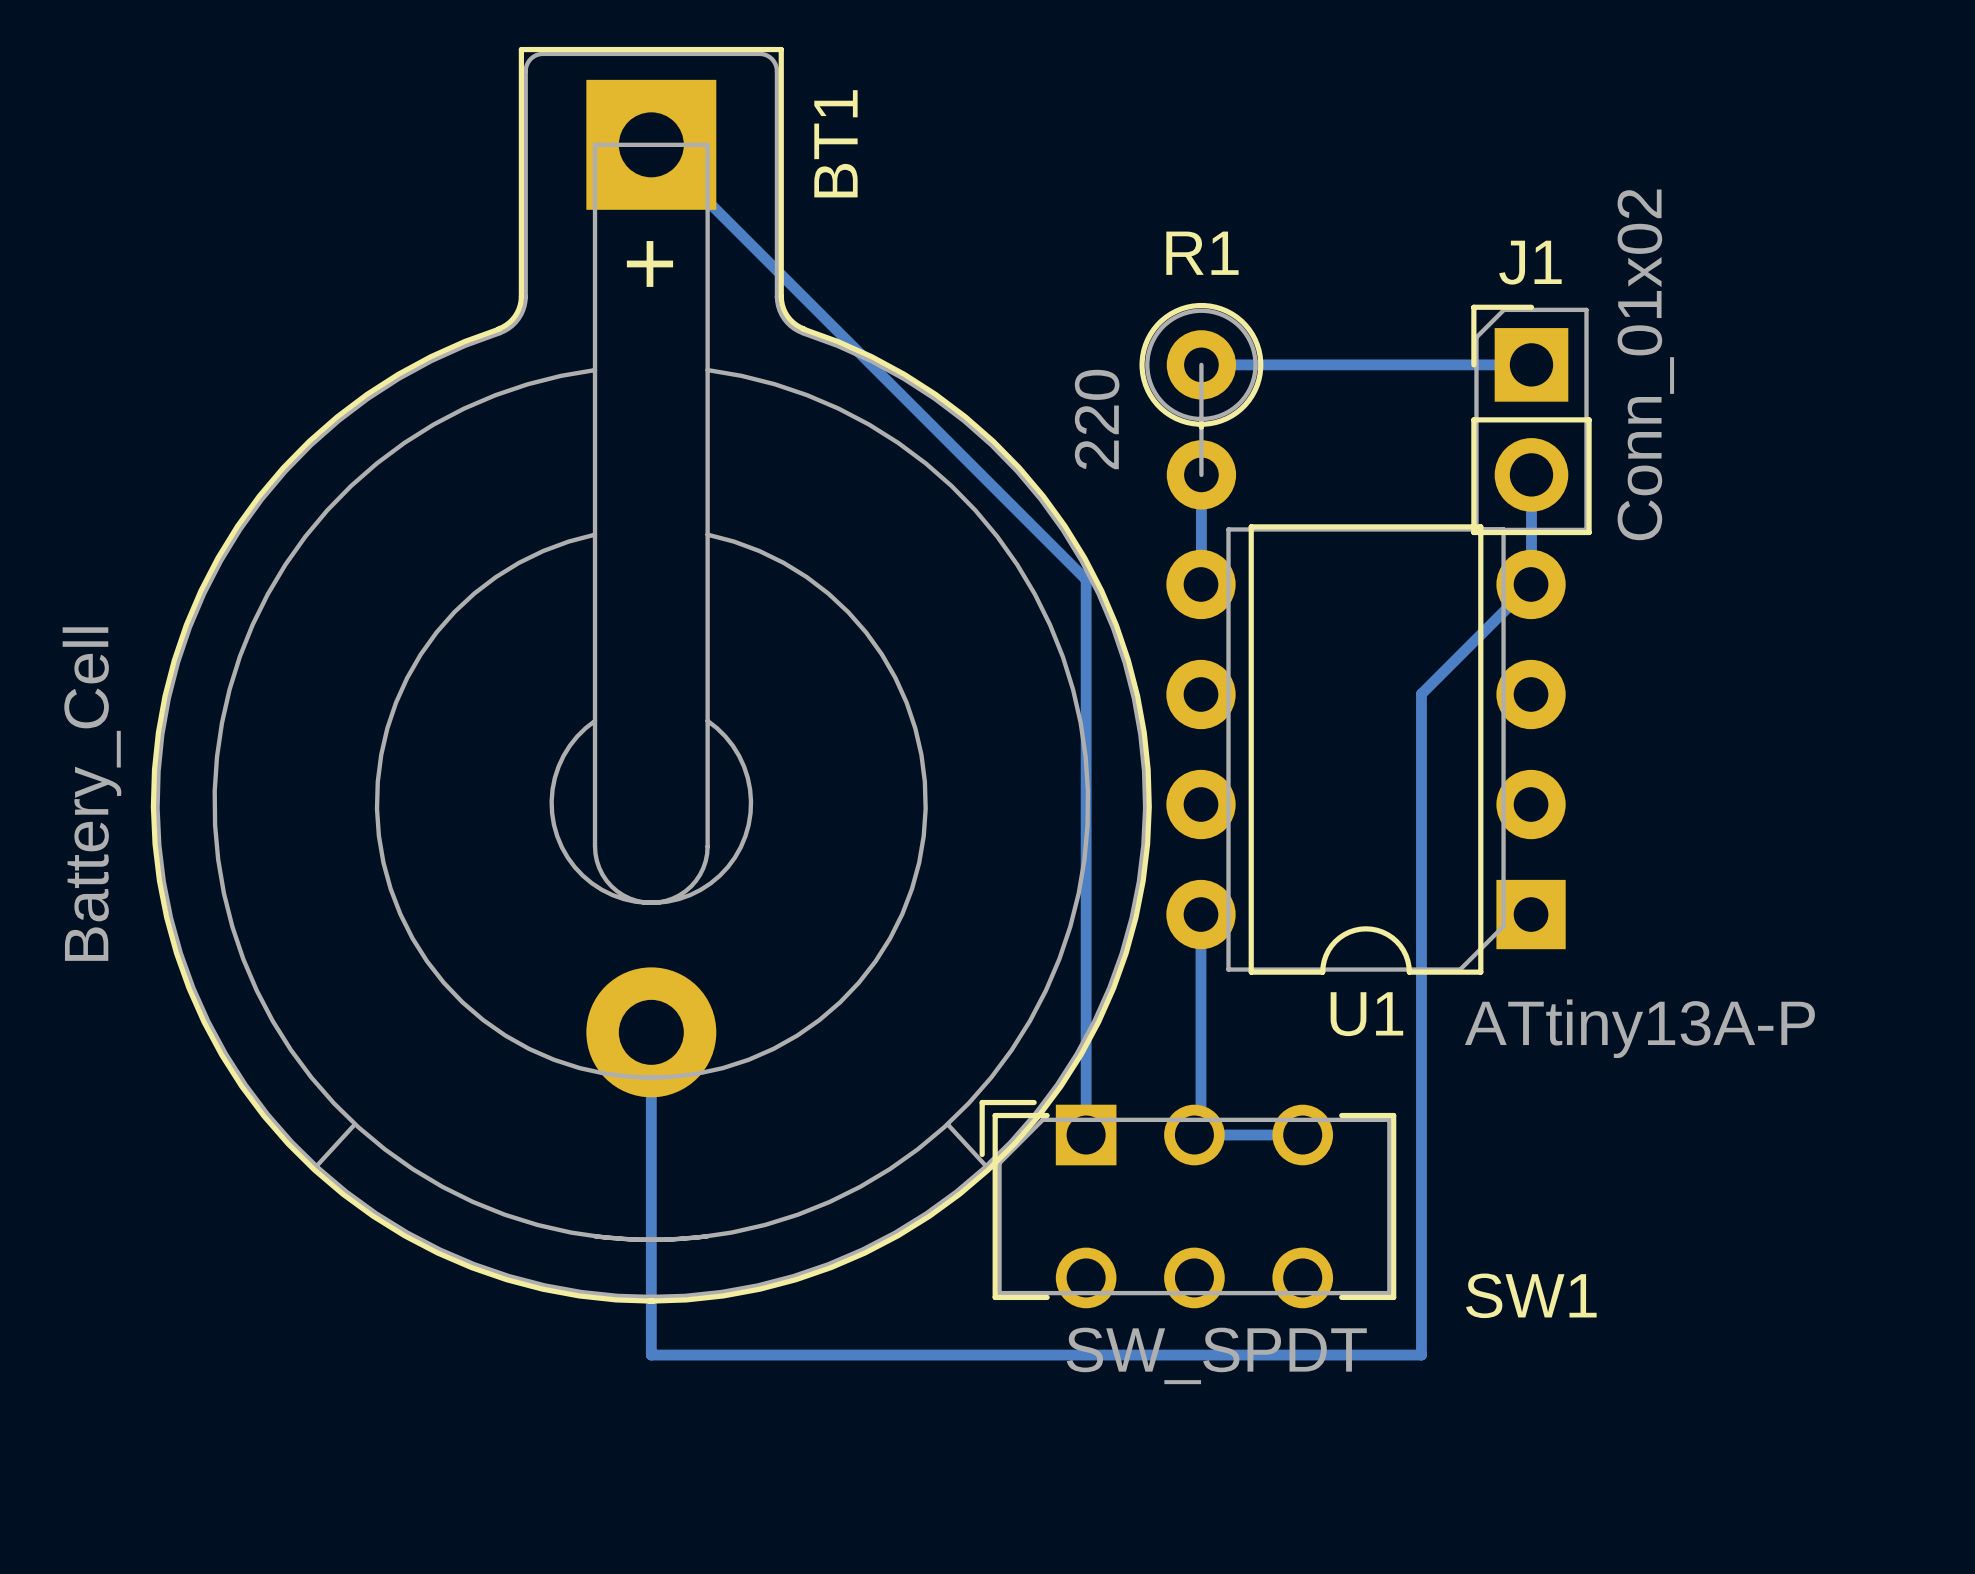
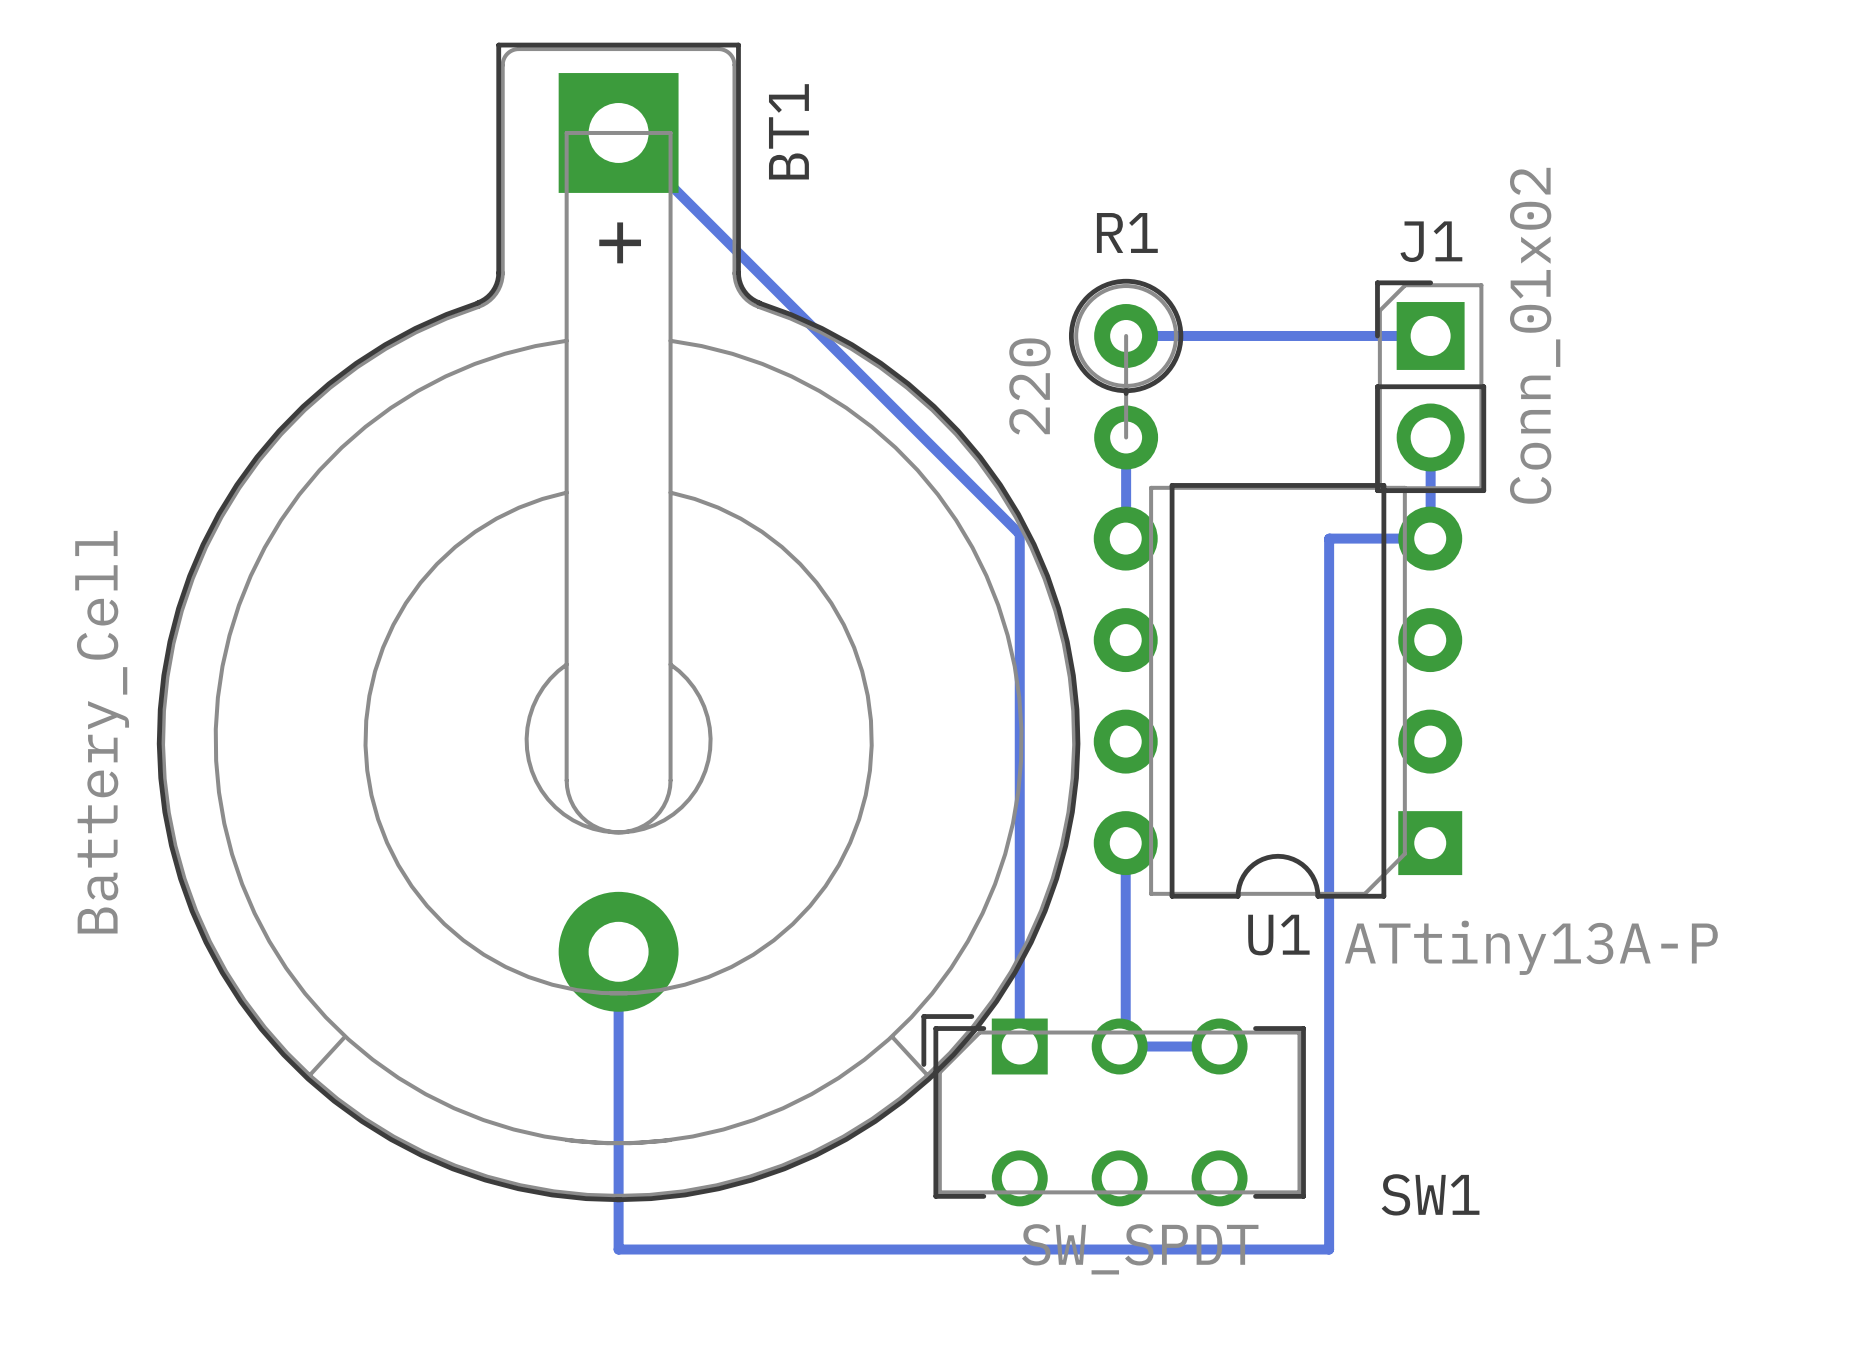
bottom track: none -> (1329, 538) (1329, 639)
bottom track: (1531, 584) (1421, 694) -> (1430, 538) (1329, 538)

